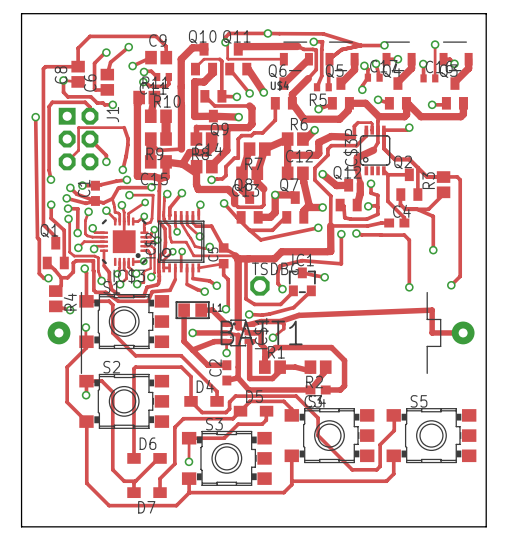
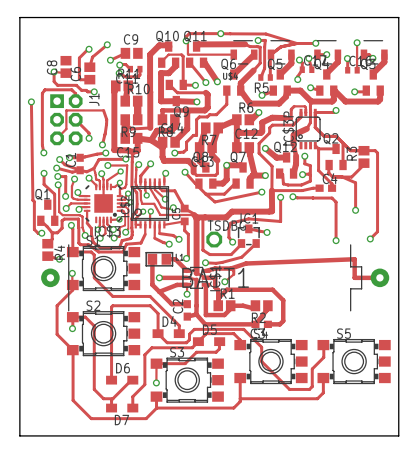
track: (166, 57) (166, 46) (156, 36) (89, 36) (78, 48) (78, 66) -> none
track: (78, 66) (45, 66) (43, 68) (43, 224) (55, 237) (55, 243) -> none

